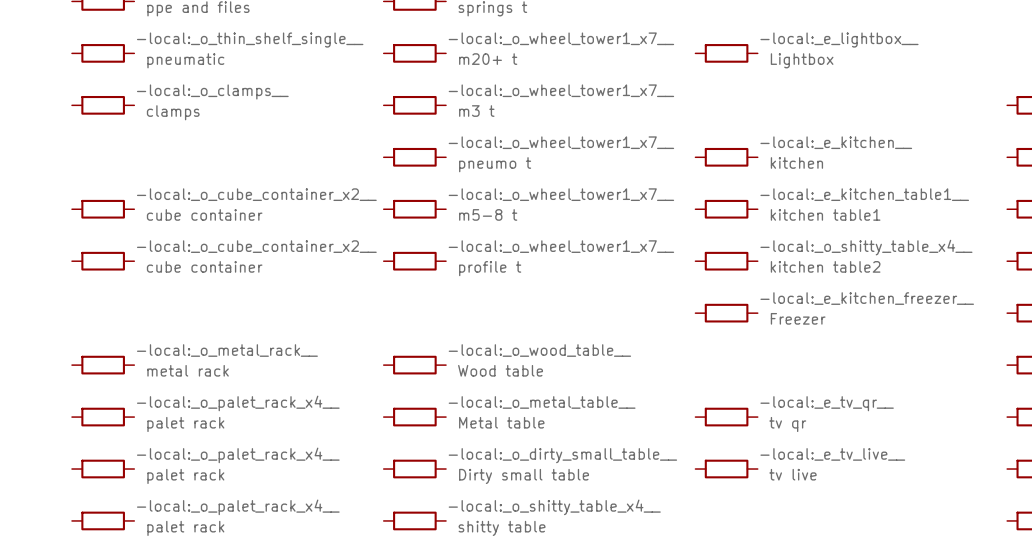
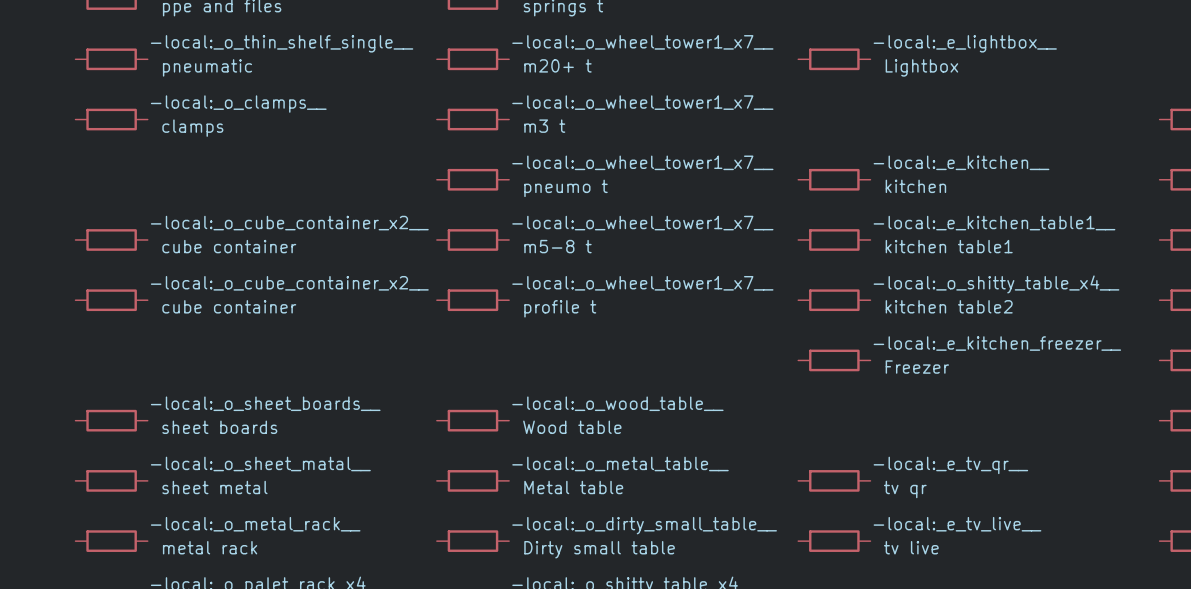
part text: -local:_o_metal_rack__ (227, 350) -> -local:_o_sheet_boards__ (265, 403)
part value: metal rack (188, 370) -> sheet boards (219, 427)
part text: -local:_o_palet_rack_x4__ (238, 403) -> -local:_o_sheet_matal__ (260, 463)
part value: palet rack (185, 424) -> sheet metal (214, 487)
part text: -local:_o_palet_rack_x4__ (238, 455) -> -local:_o_metal_rack__ (255, 524)
part value: palet rack (185, 476) -> metal rack (210, 547)

